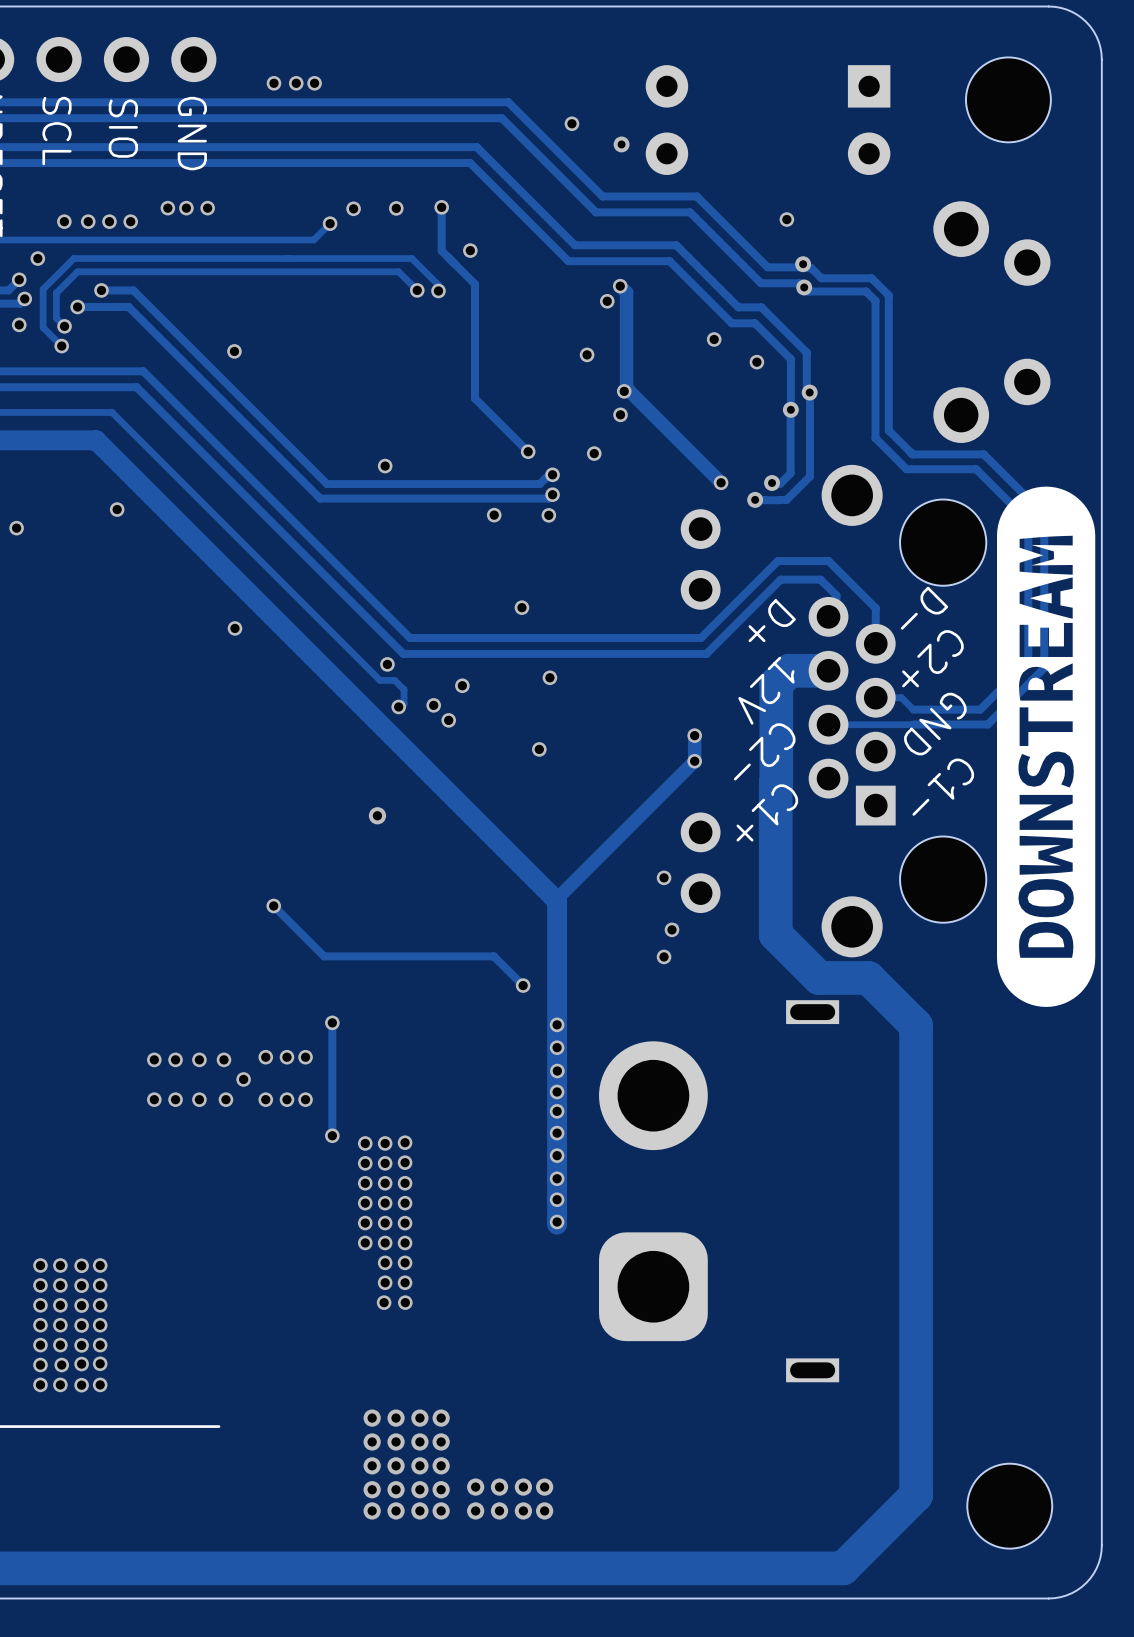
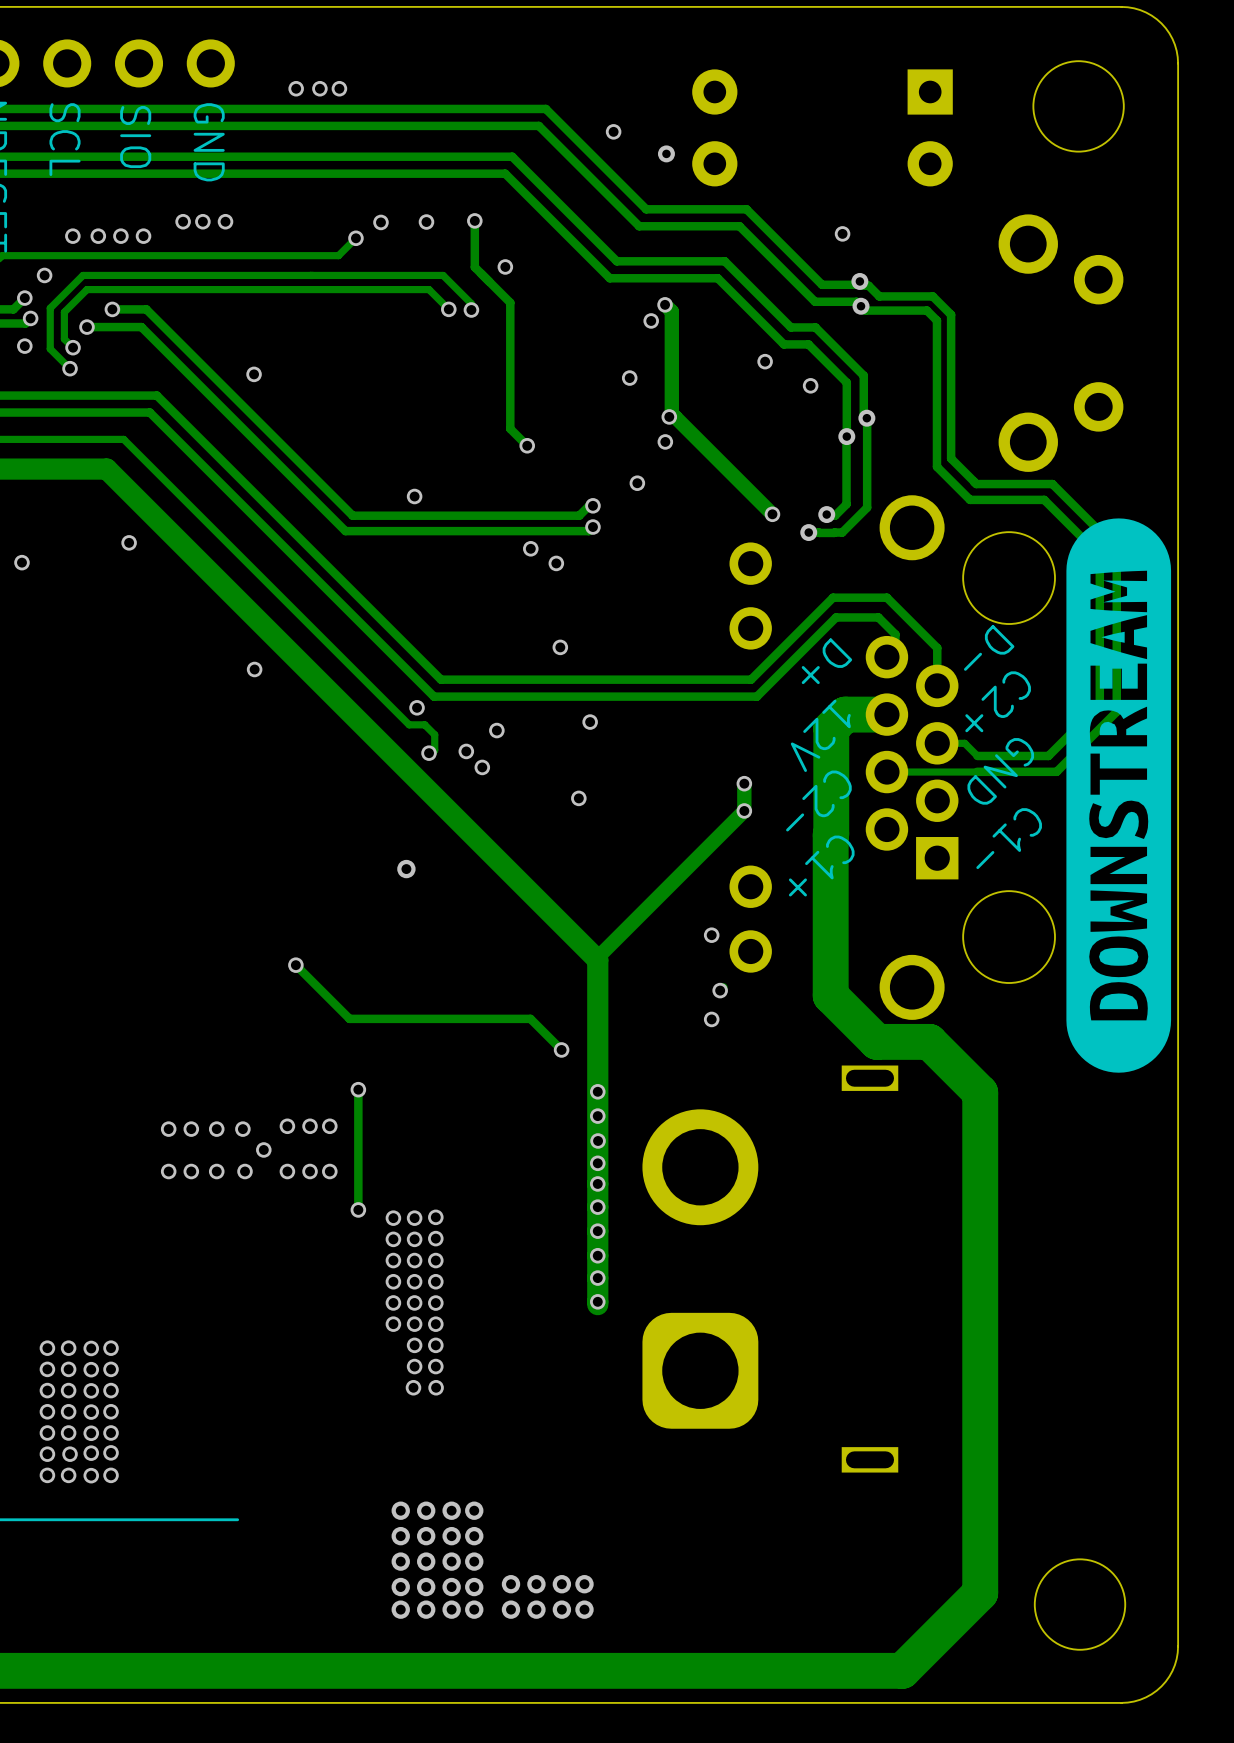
track: (474, 398) (528, 451) -> (510, 424) (510, 428) (527, 445)
via: none -> (527, 445)
via: (528, 451) -> none
via position: (548, 515) -> (556, 563)

